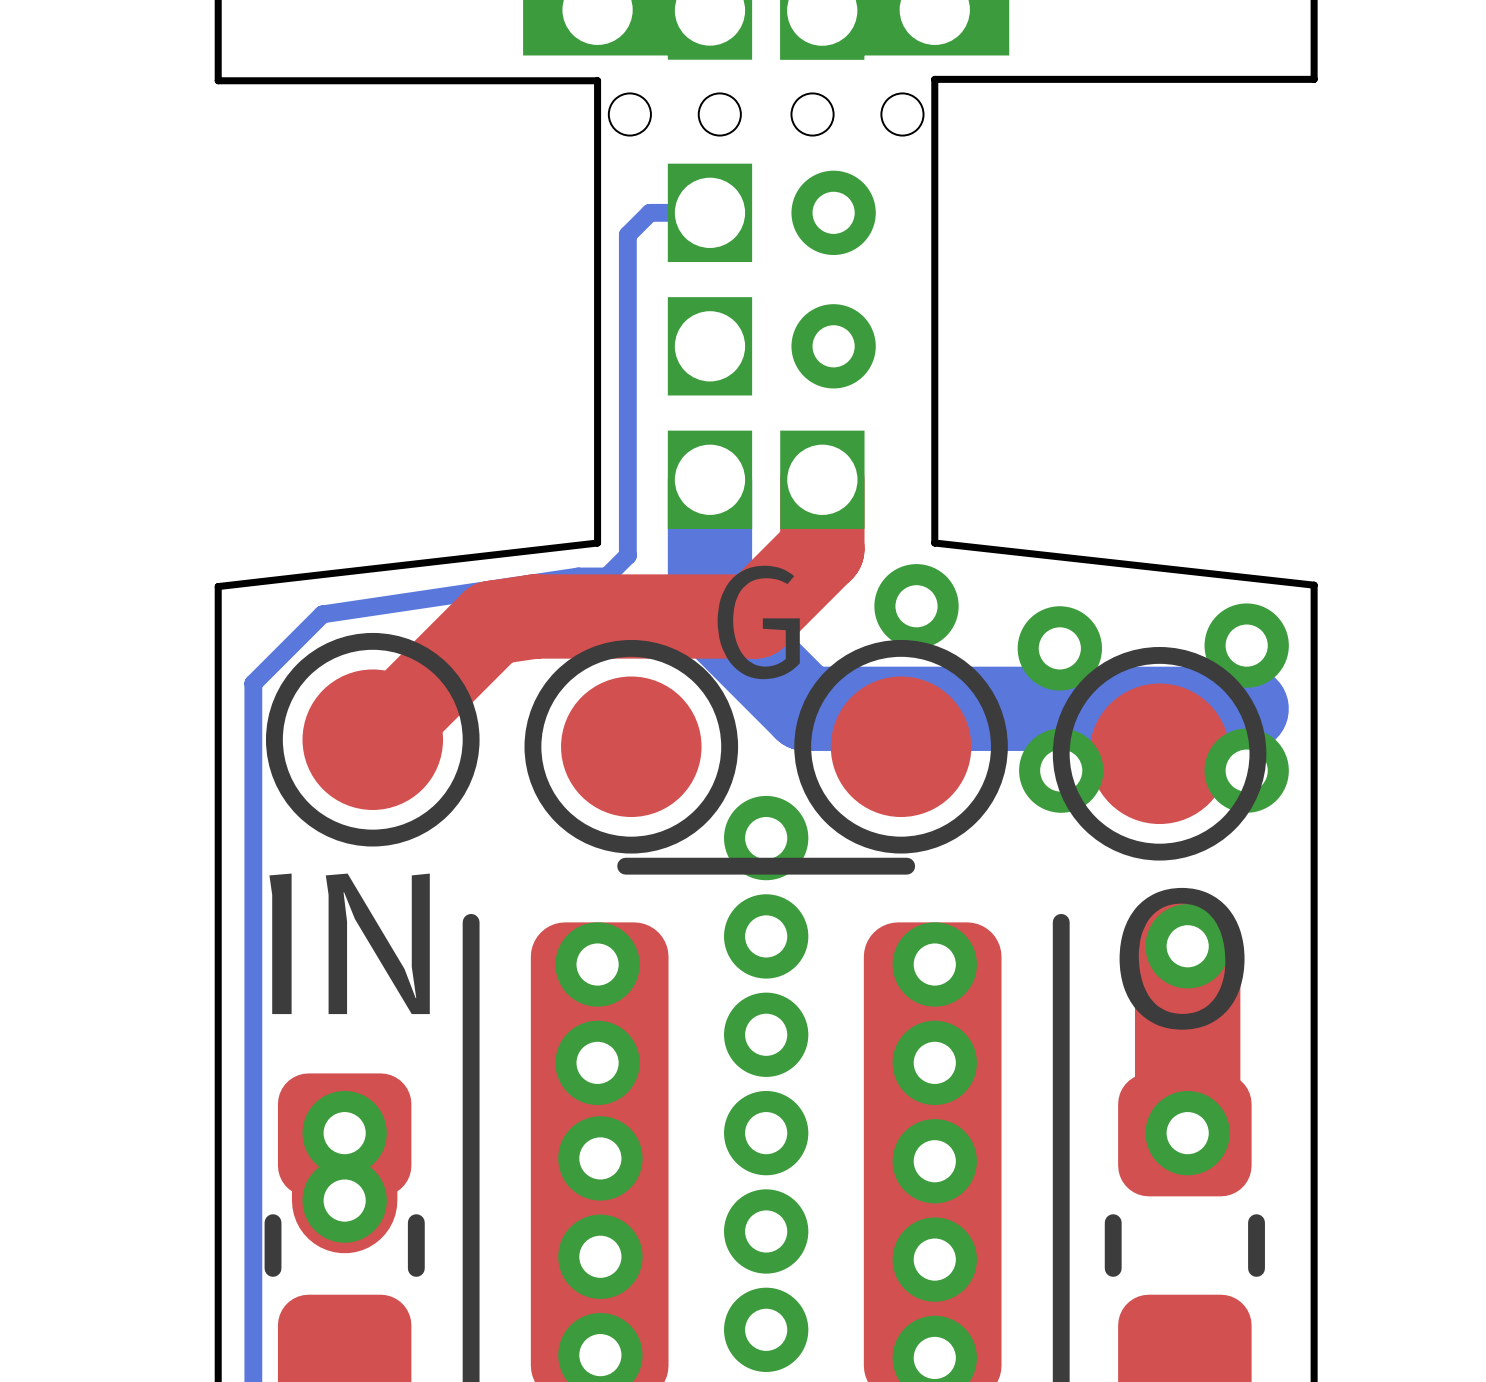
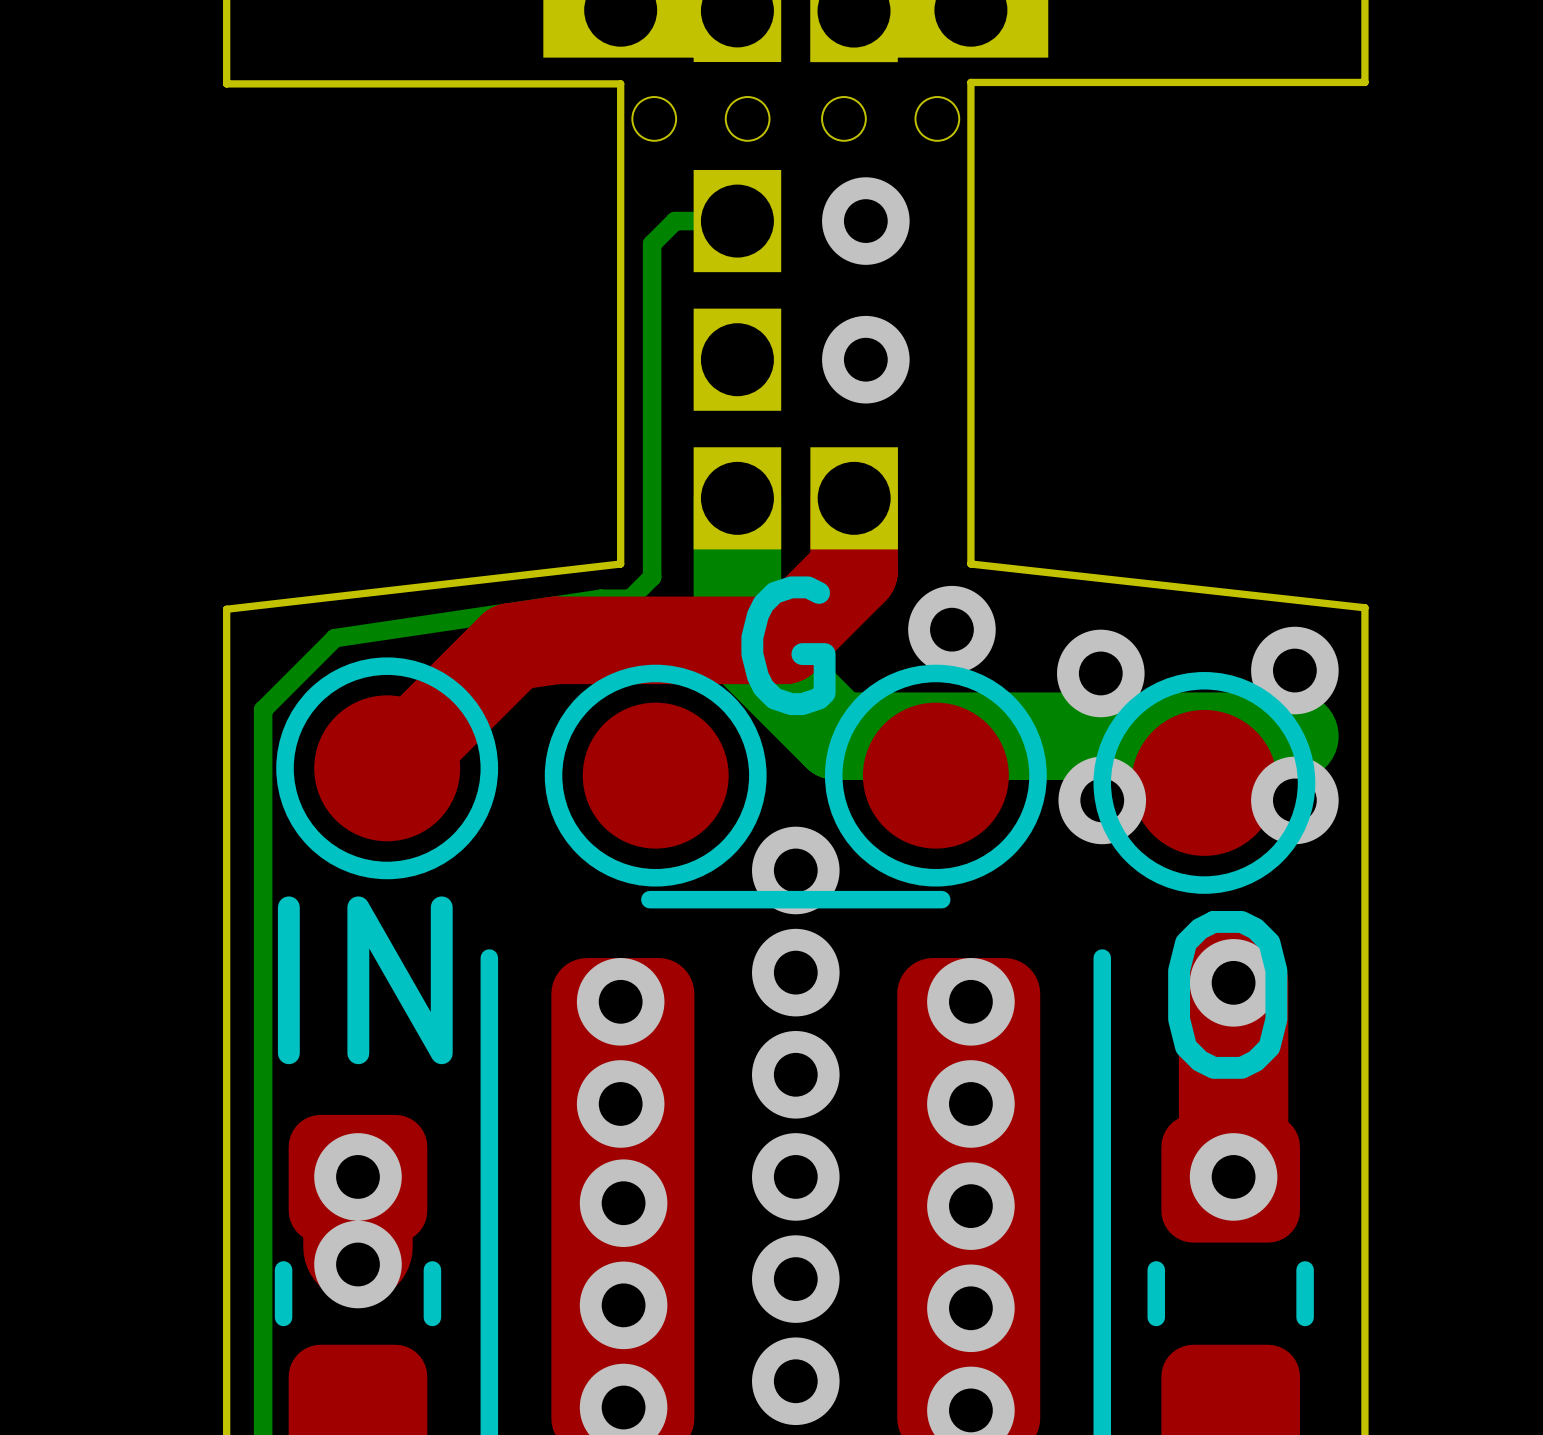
via position: (344, 1200) -> (357, 1264)

